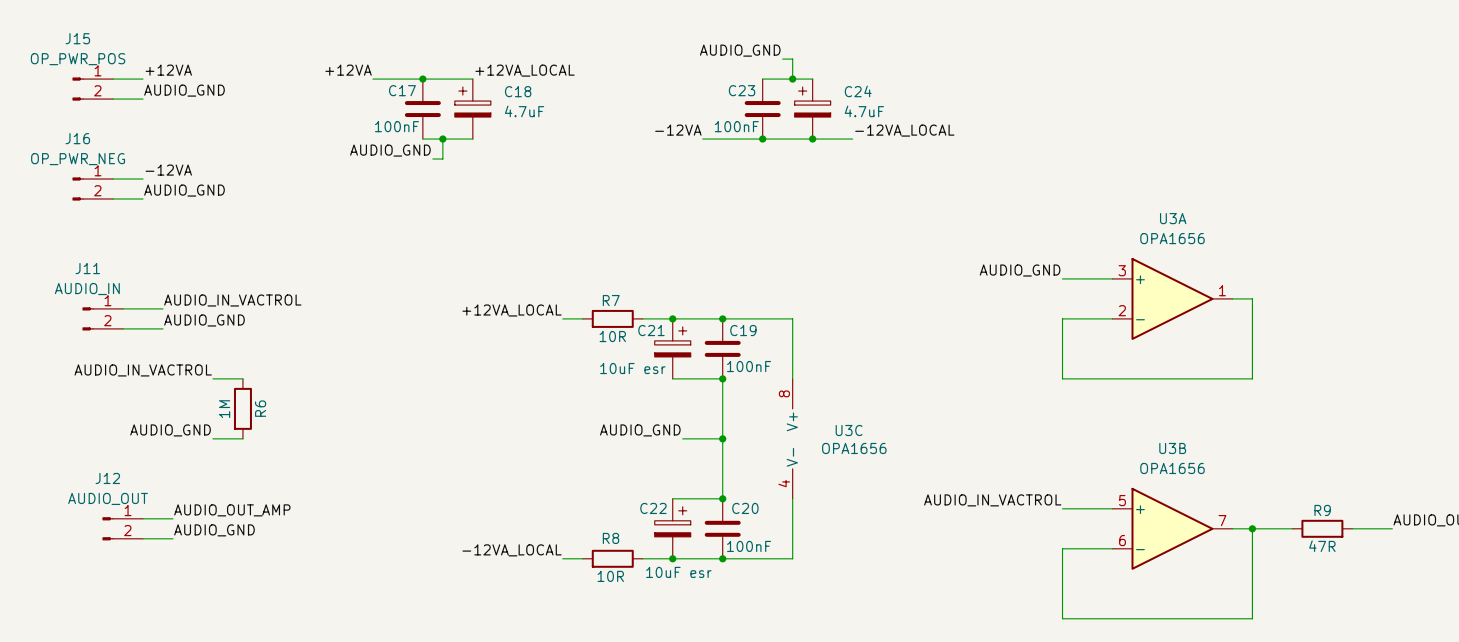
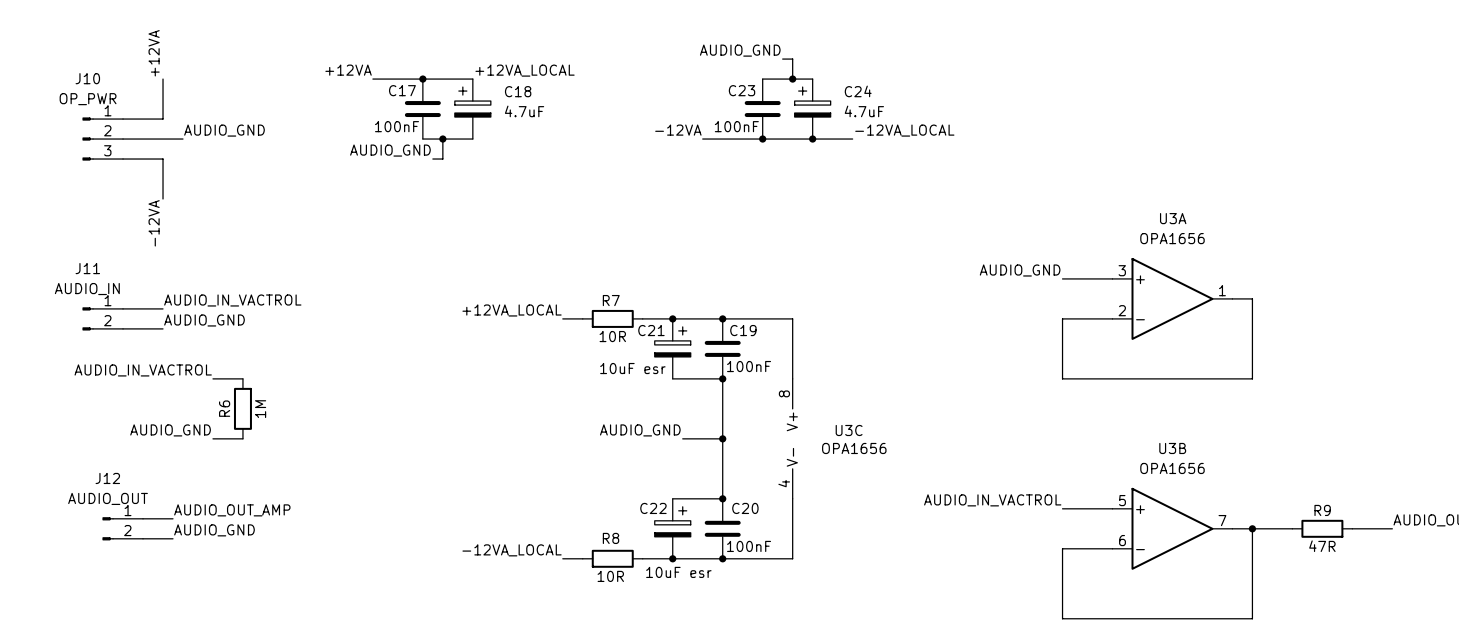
label rotation: 0° (168, 70) -> 90° counterclockwise (154, 53)
wire: (113, 79) (143, 79) -> none
wire: none -> (163, 79) (163, 119) (123, 119)
J15: OP_PWR_POS (92, 89) -> none
label: AUDIO_GND (184, 90) -> none
wire: (113, 99) (143, 99) -> none
label: none -> AUDIO_GND (224, 130)
J10: none -> OP_PWR (102, 139)
wire: none -> (123, 139) (183, 139)
wire: none -> (123, 159) (163, 159) (163, 198)
label rotation: 0° (168, 170) -> 90° counterclockwise (154, 223)
label position: -12VA (168, 170) -> -12VA (154, 223)
wire: (113, 179) (143, 179) -> none
J16: OP_PWR_NEG (92, 188) -> none
label: AUDIO_GND (184, 190) -> none
wire: (113, 198) (143, 198) -> none
R6 name position: R6 (260, 408) -> R6 (224, 408)
R6 value position: 1M (224, 409) -> 1M (260, 409)

